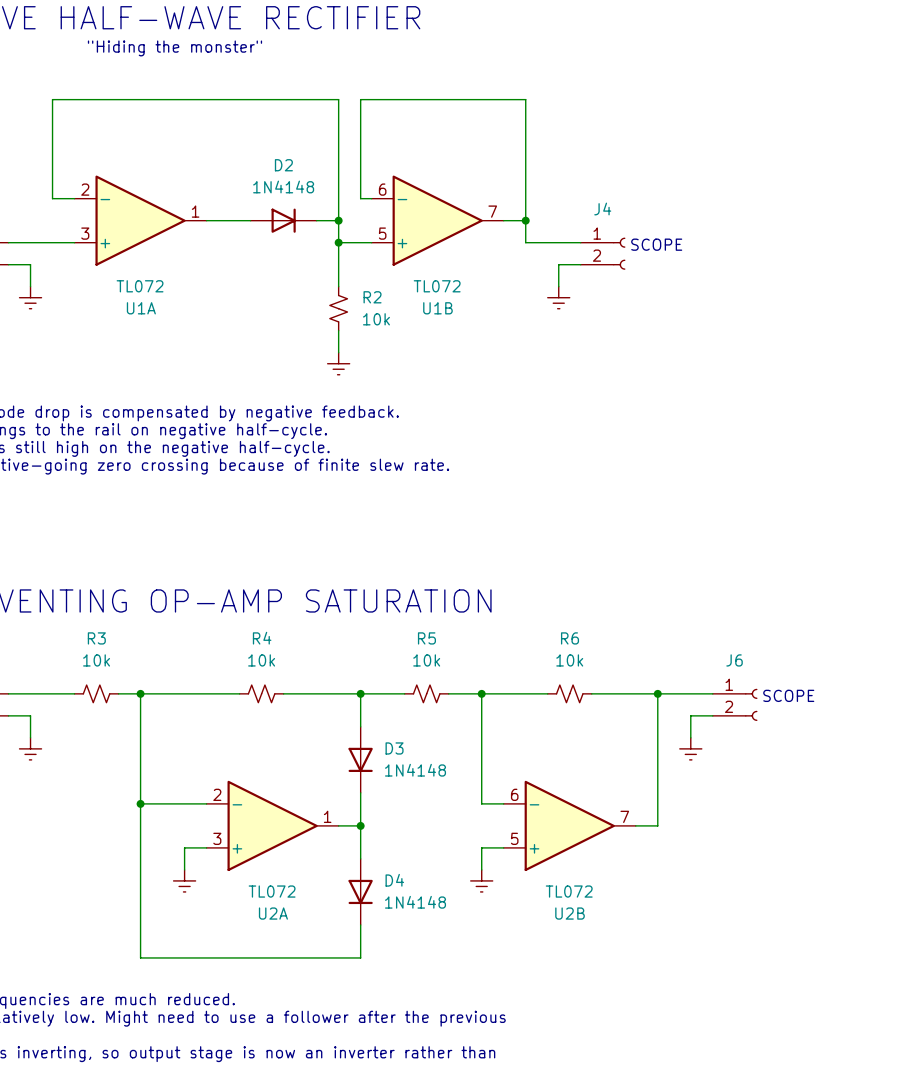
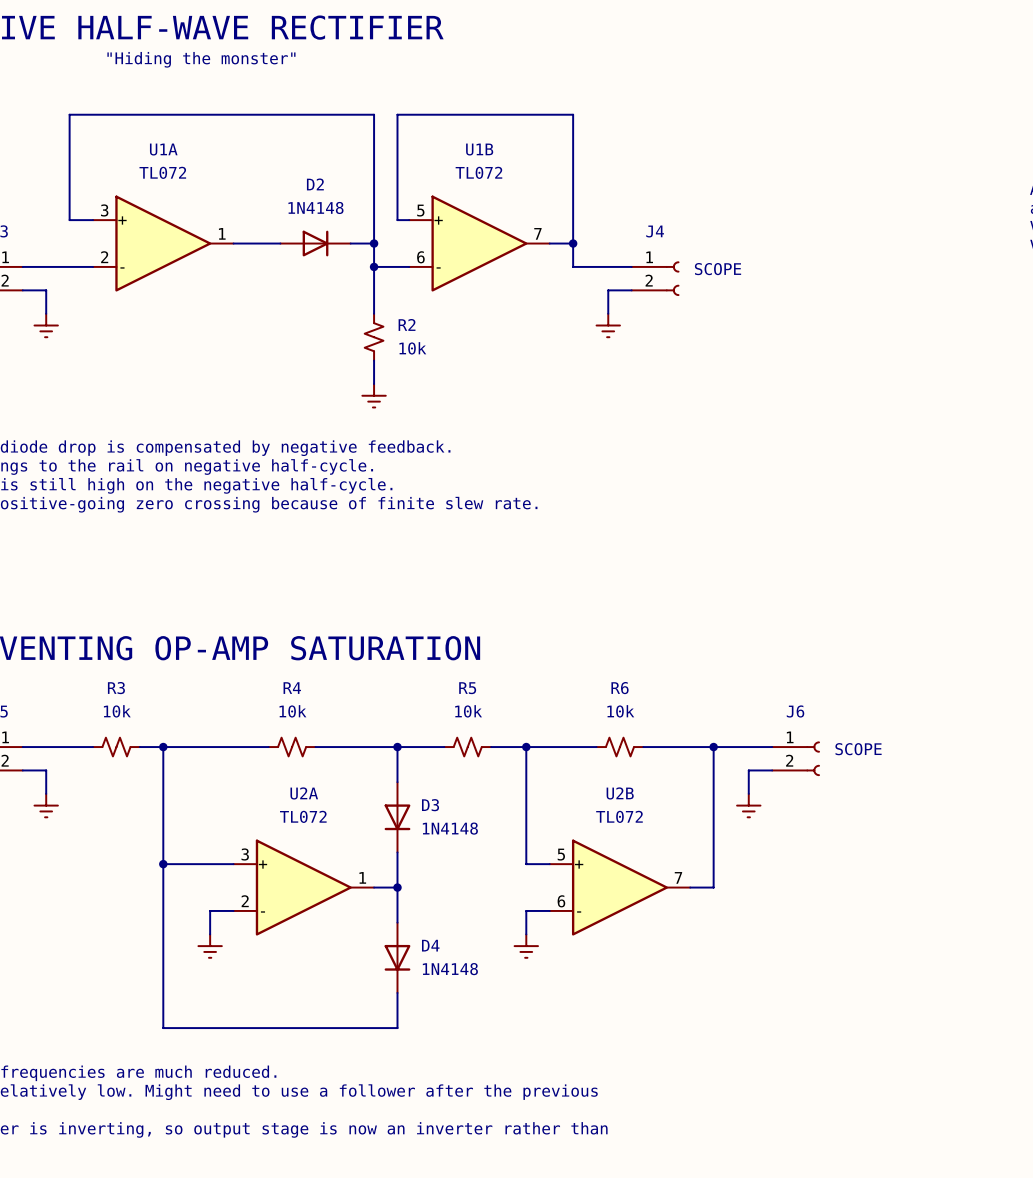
U1A flip: as is (140, 220) -> up-down (163, 243)
U1B flip: as is (437, 220) -> up-down (479, 243)
U2A flip: as is (272, 825) -> up-down (303, 887)
U2B flip: as is (569, 825) -> up-down (619, 887)

